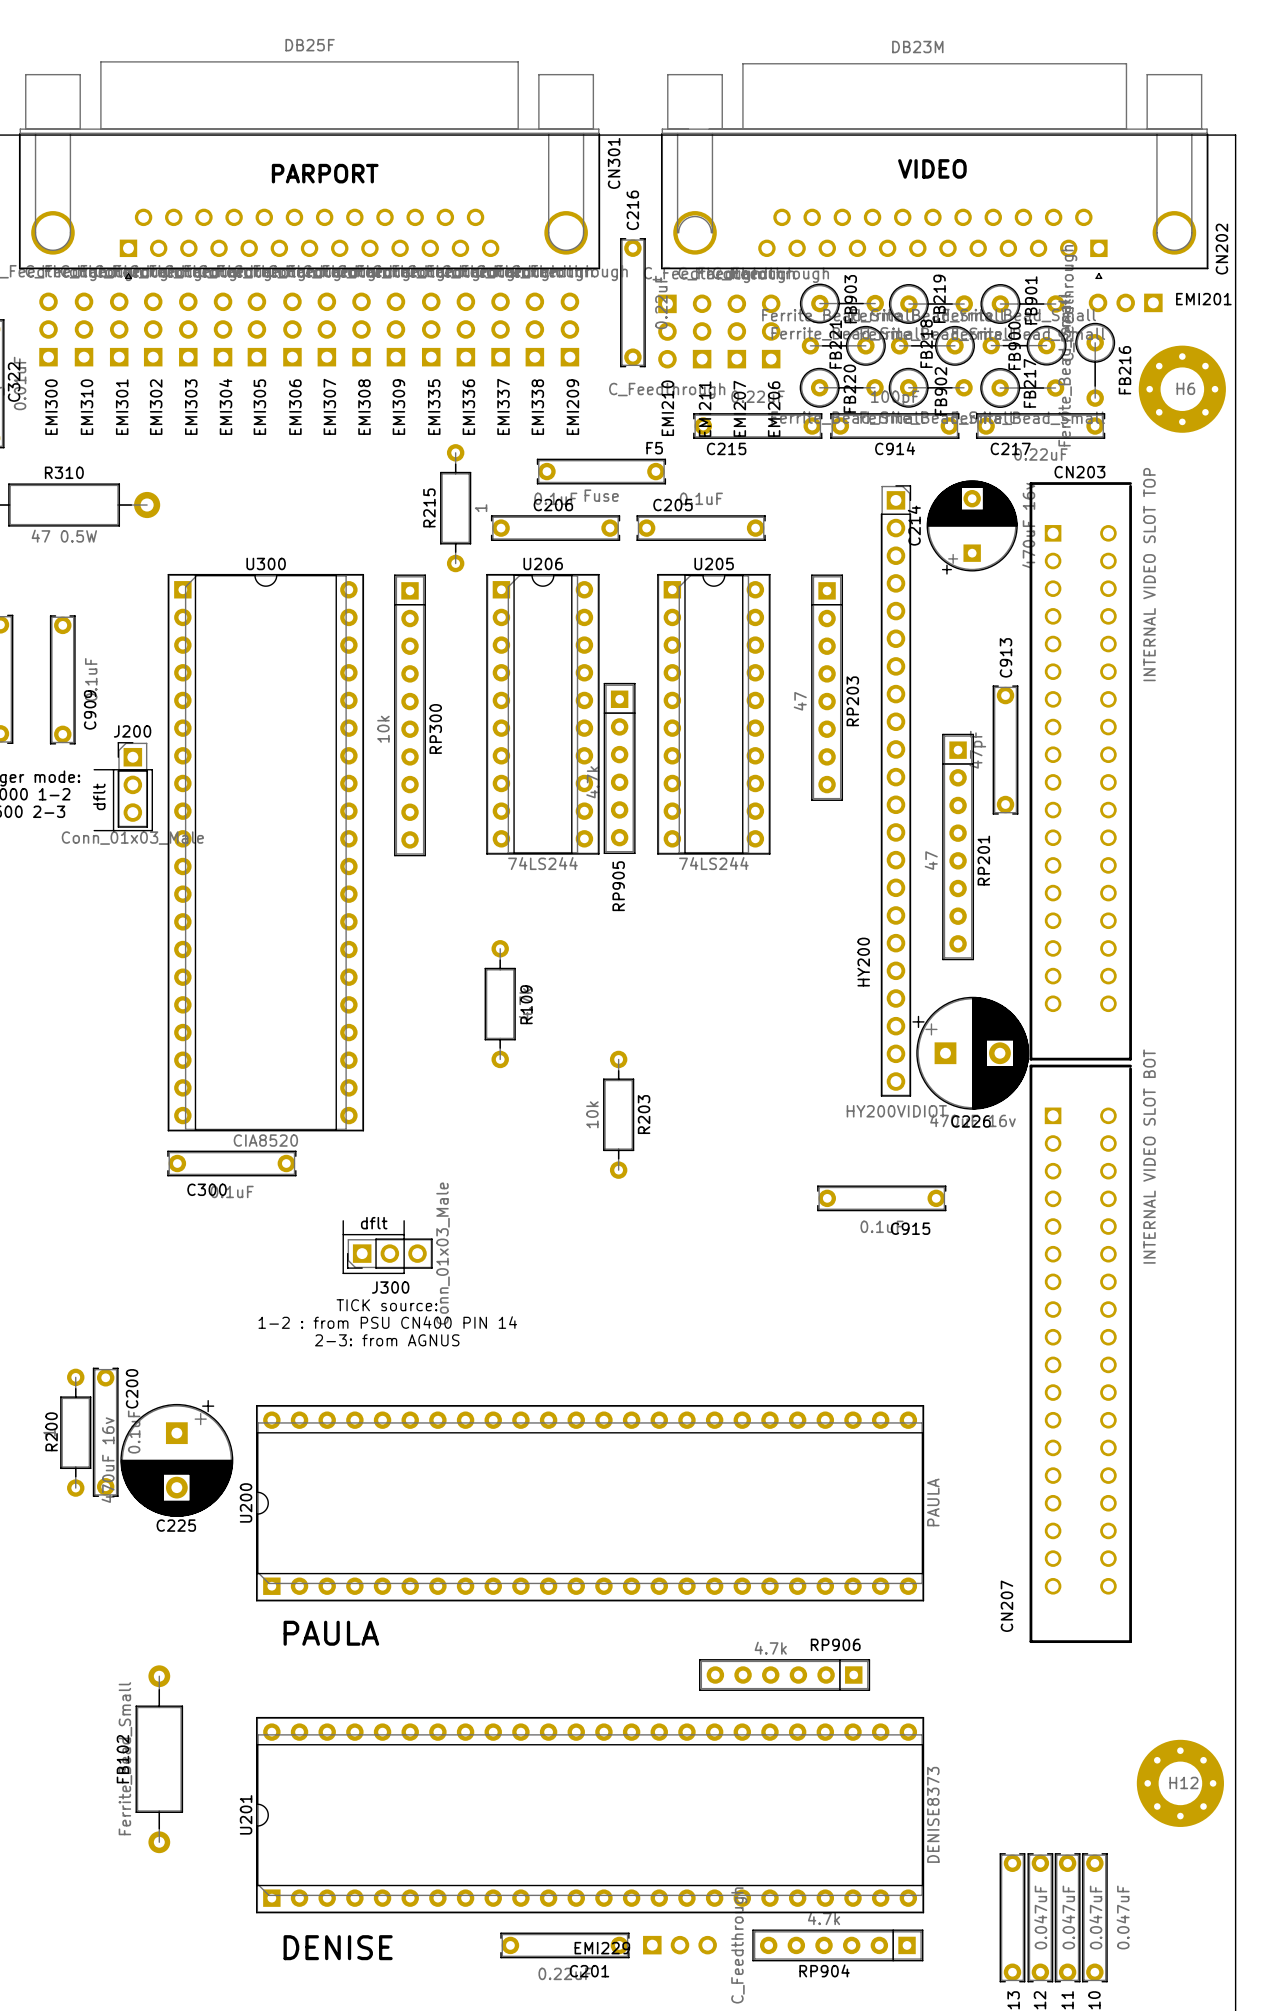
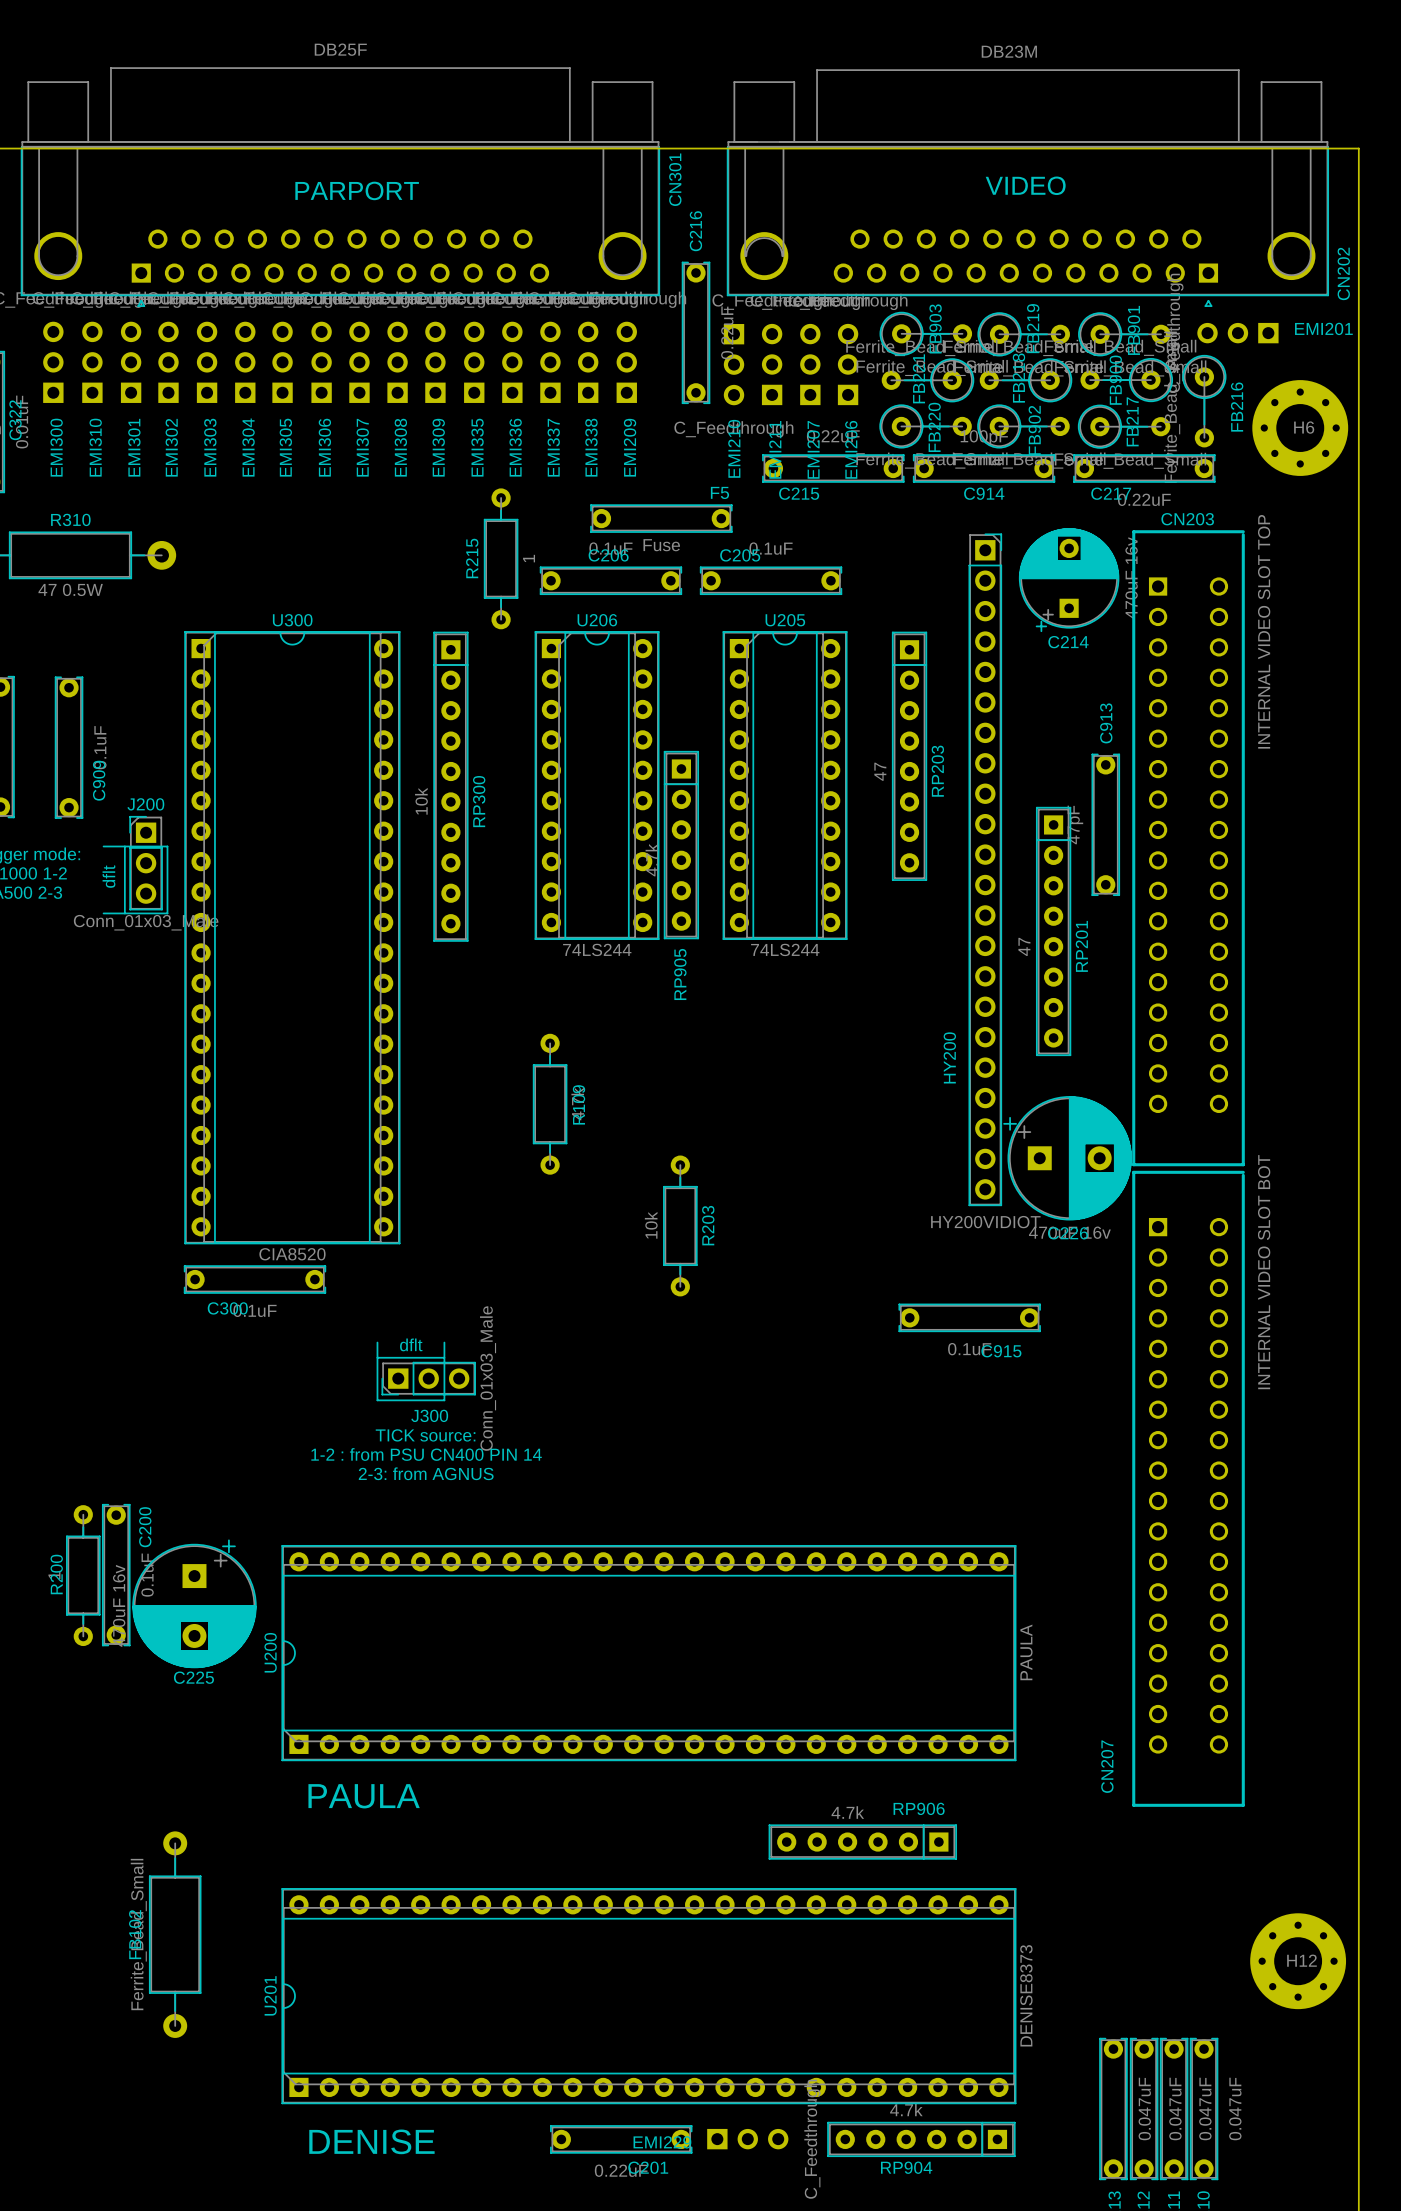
C214 name rotation: 0° (914, 525) -> 90° clockwise (1068, 642)
C214 name position: C214 (914, 525) -> C214 (1068, 642)

